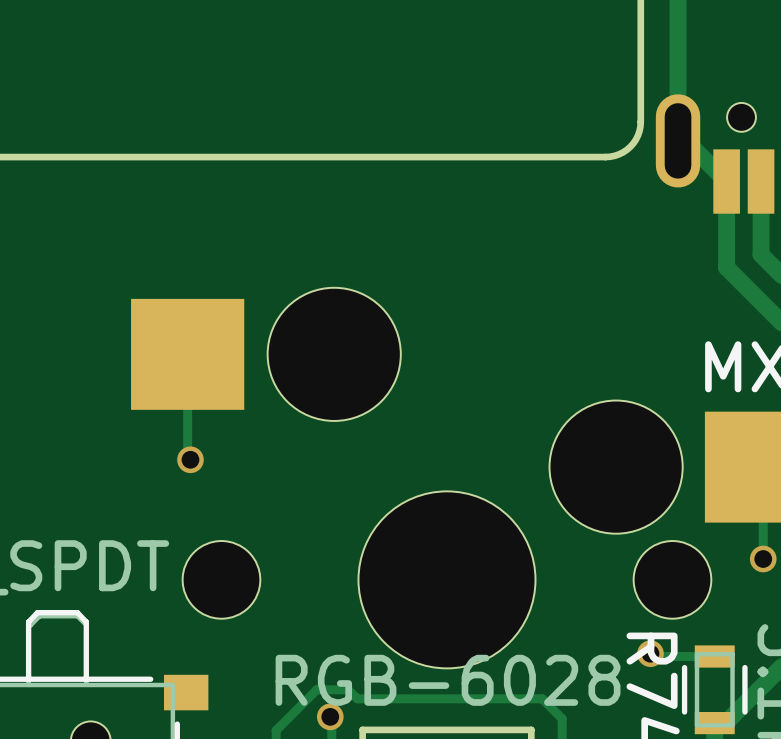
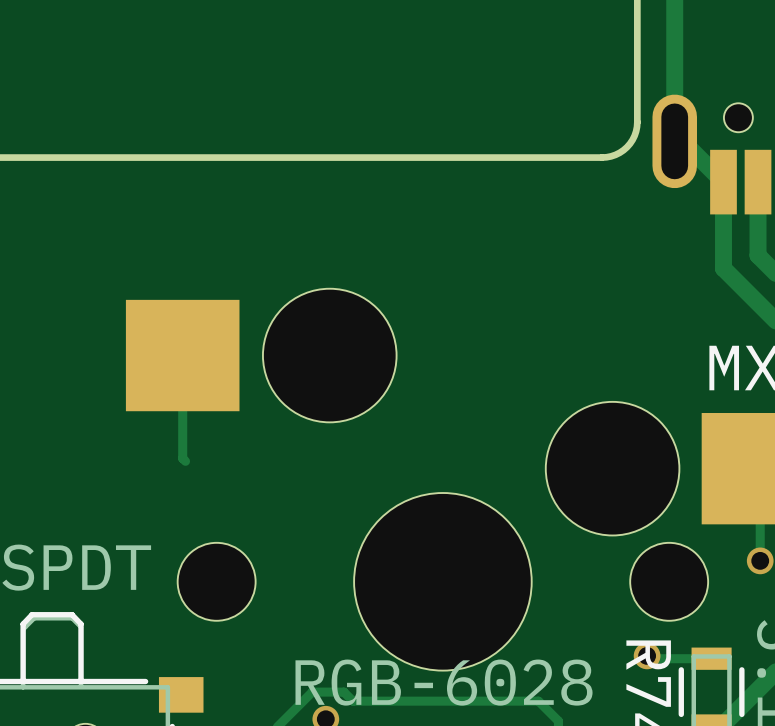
via: (190, 459) -> none

